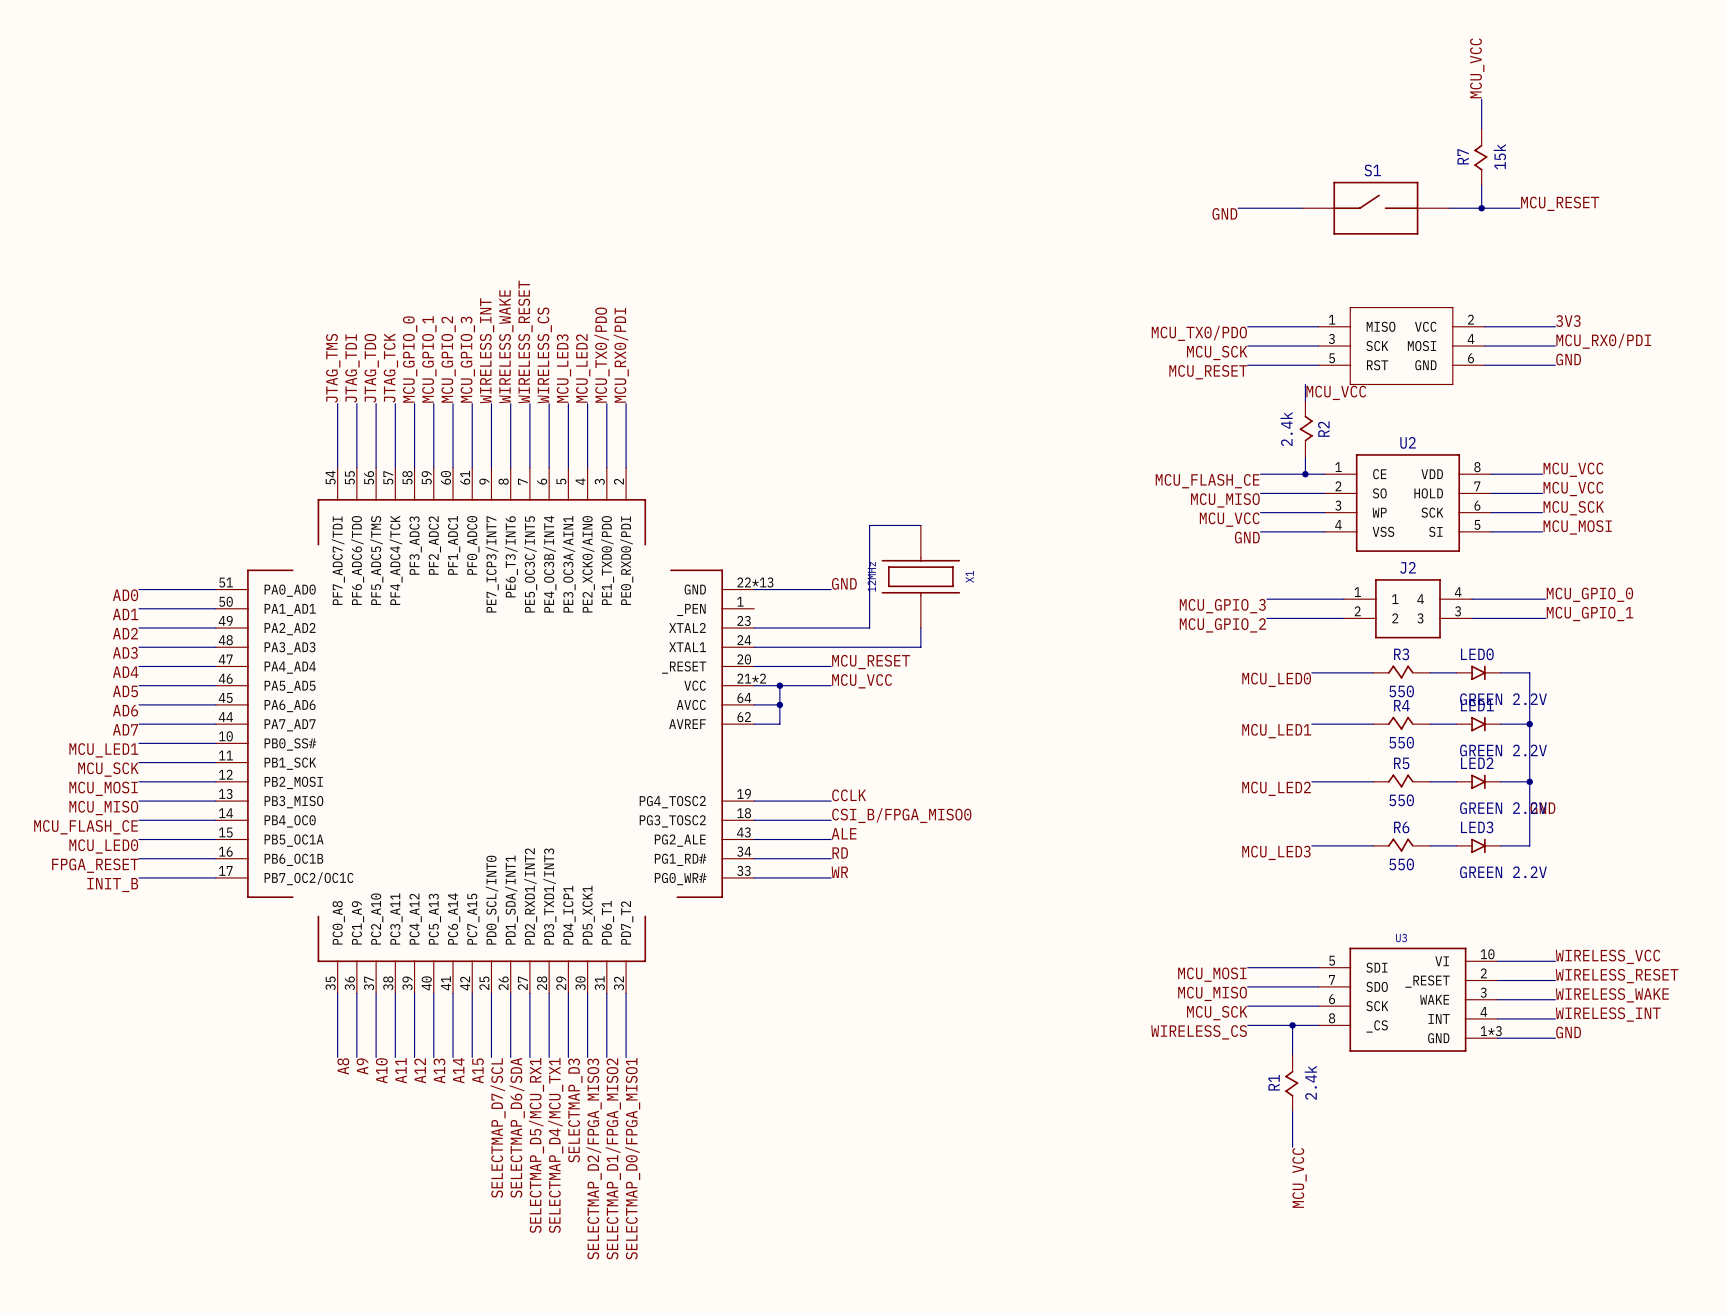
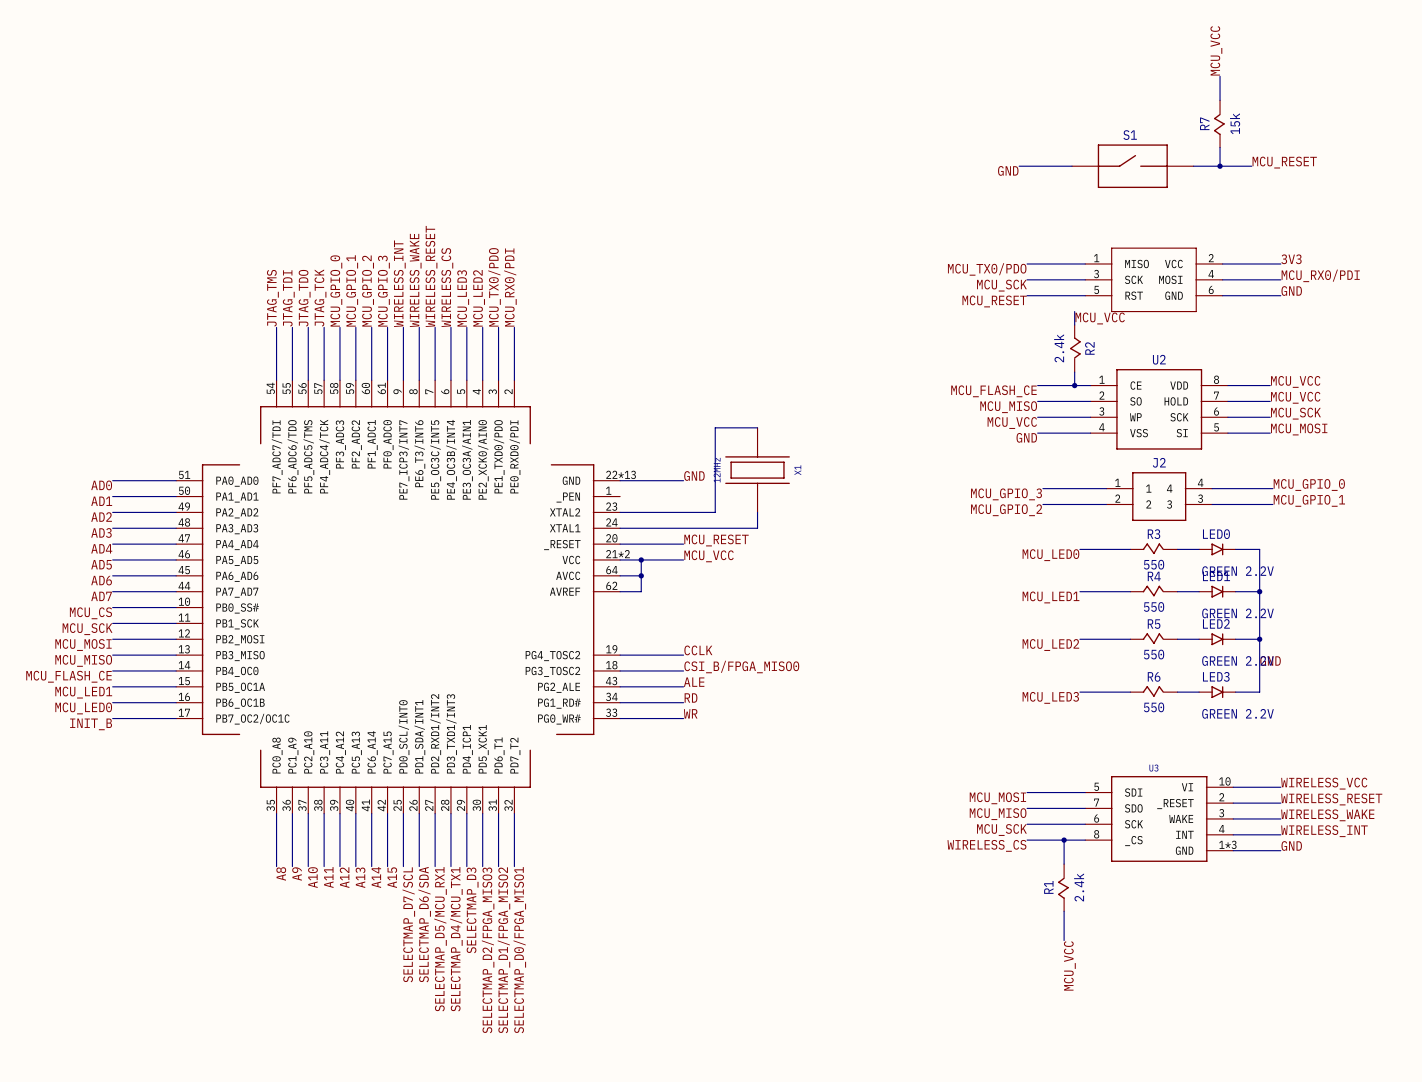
label: MCU_LED1 (103, 750) -> MCU_CS (90, 613)
label: MCU_LED0 (103, 846) -> MCU_LED1 (83, 692)
label: FPGA_RESET (95, 865) -> MCU_LED0 (83, 708)

